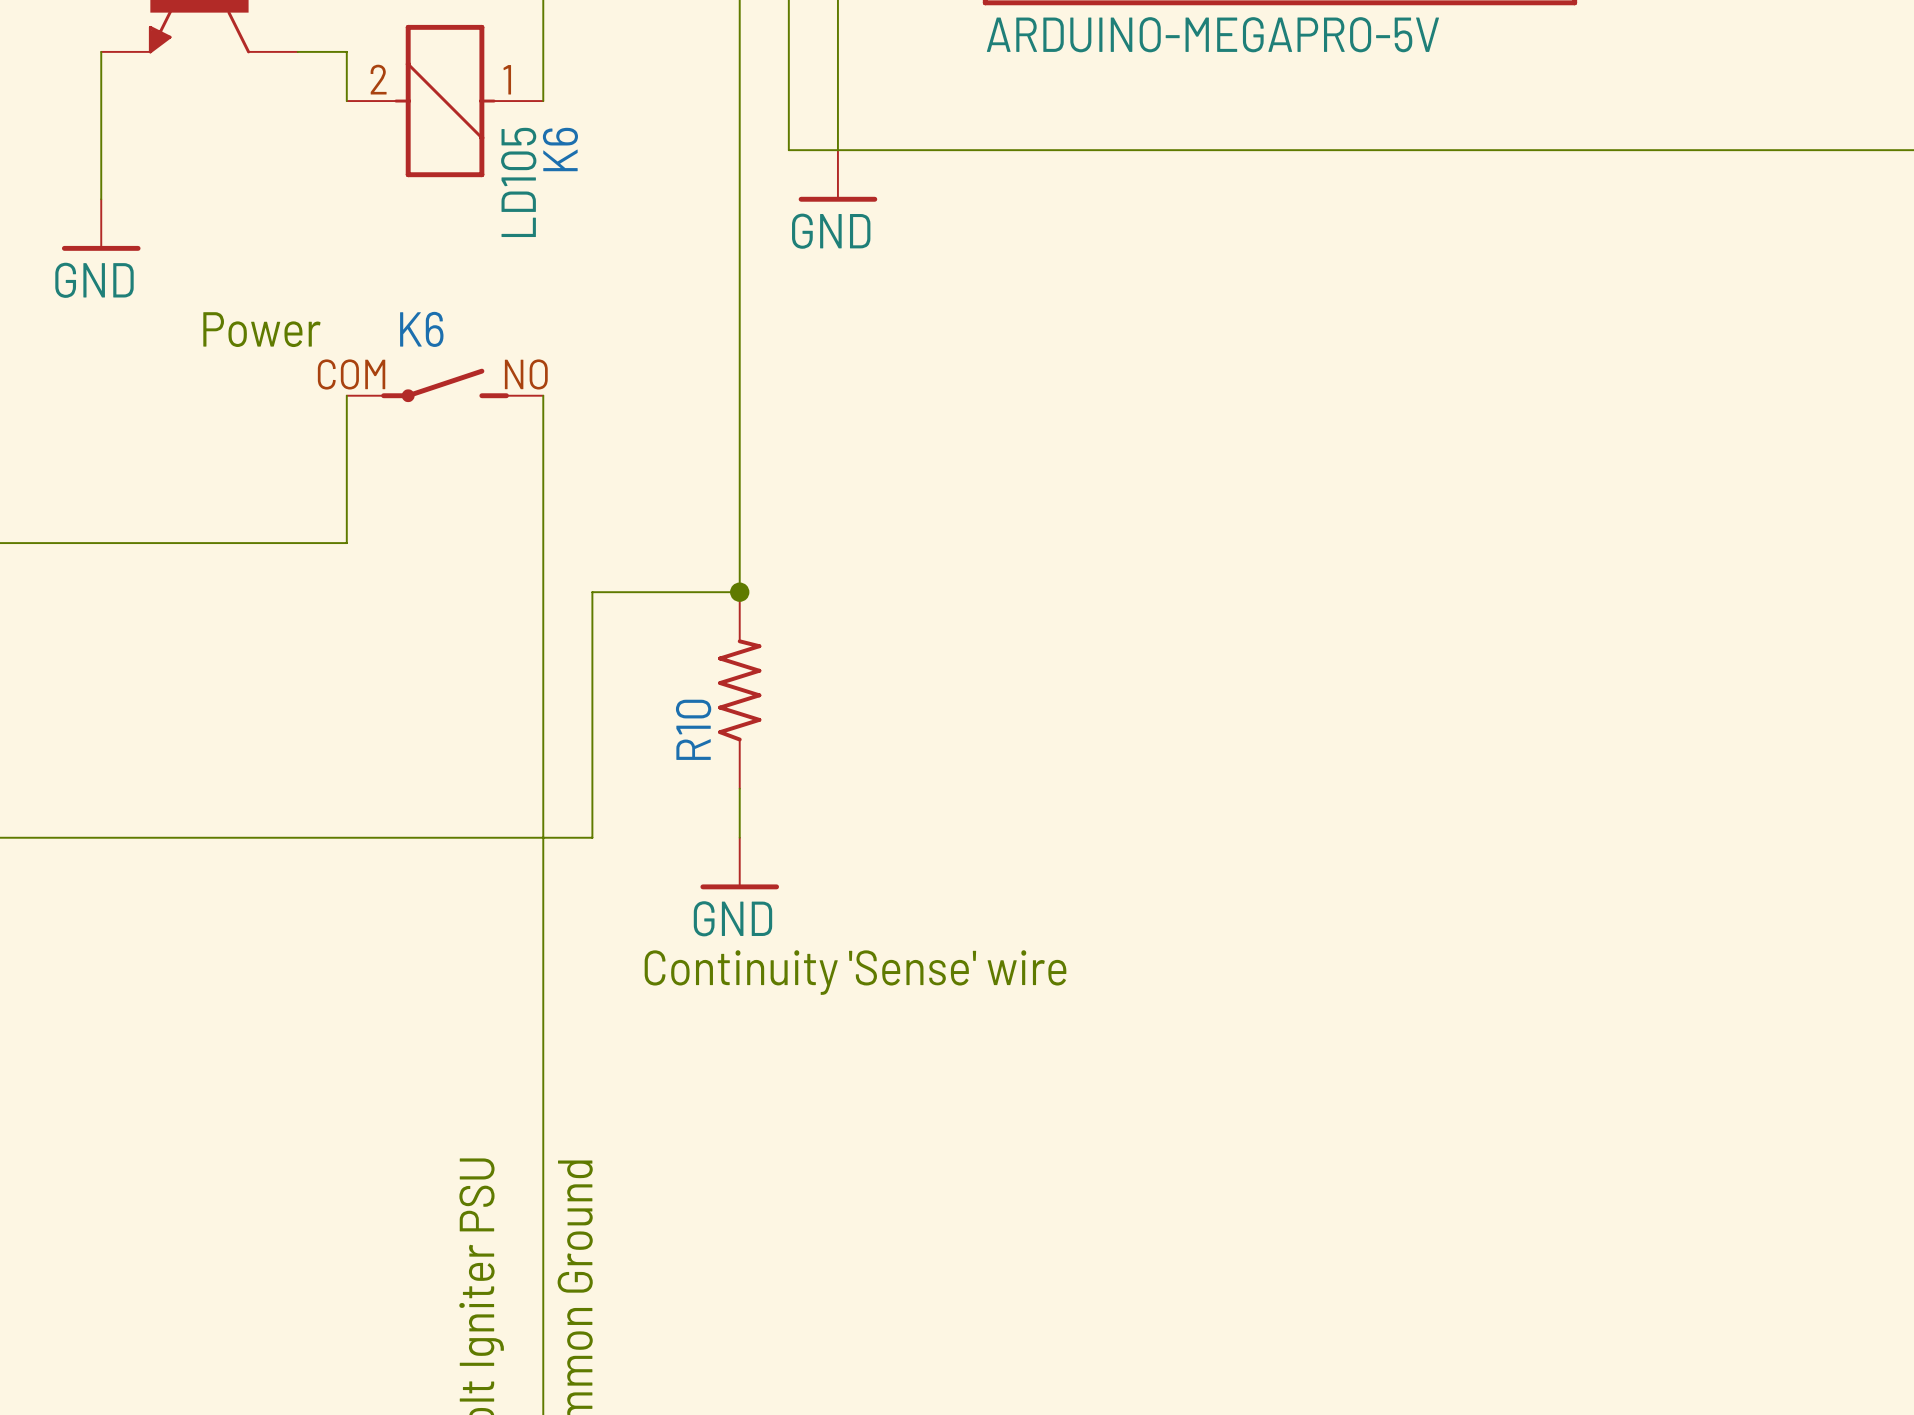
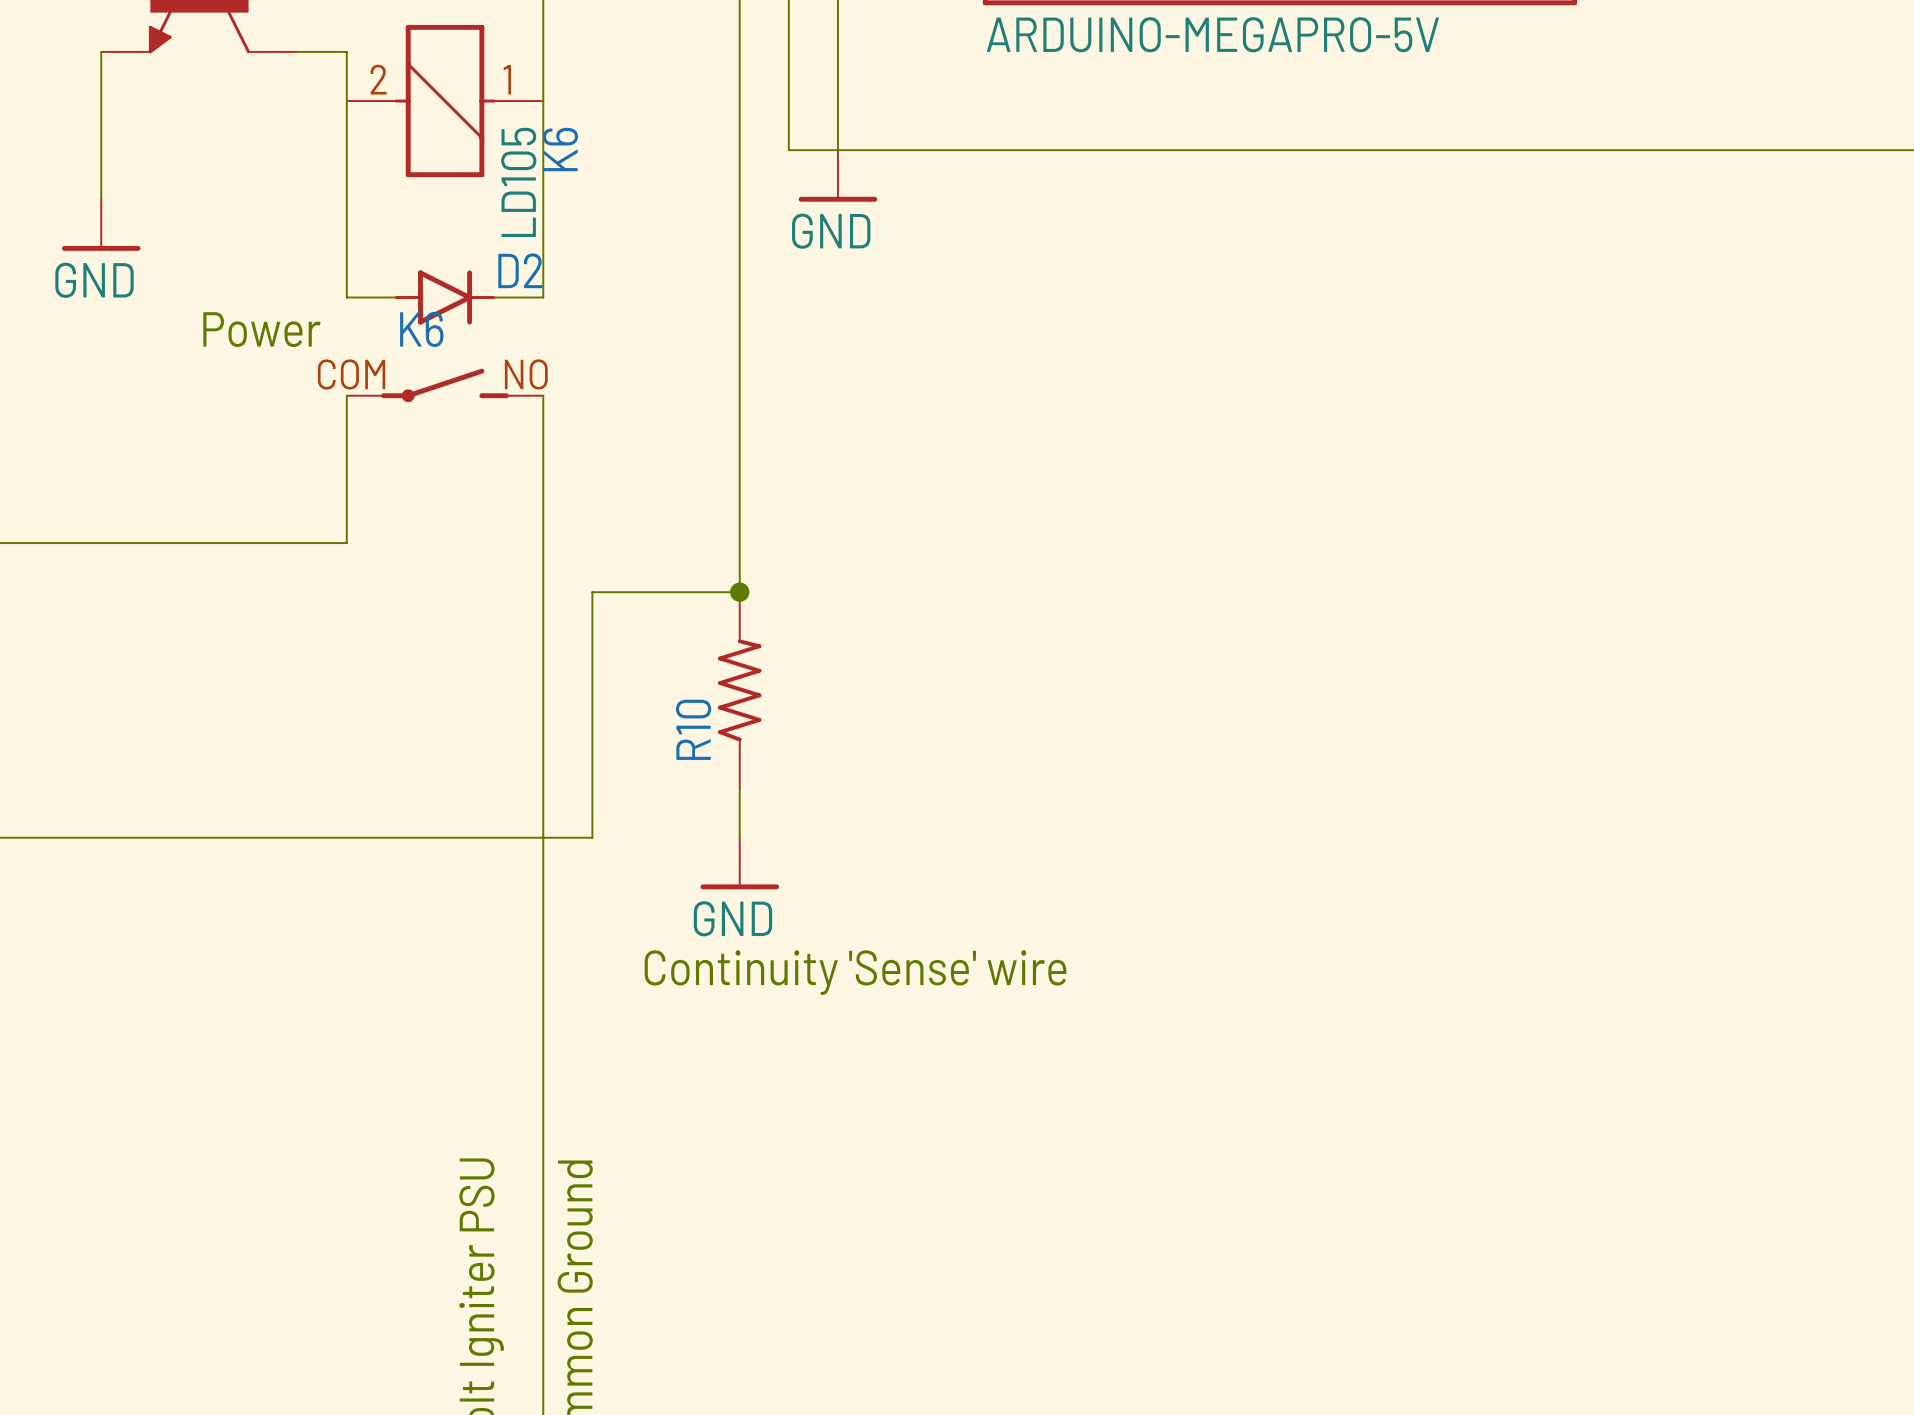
wire: none -> (346, 101) (346, 297) (395, 297)
wire: none -> (543, 101) (543, 297) (494, 297)
D2: none -> (445, 297)

